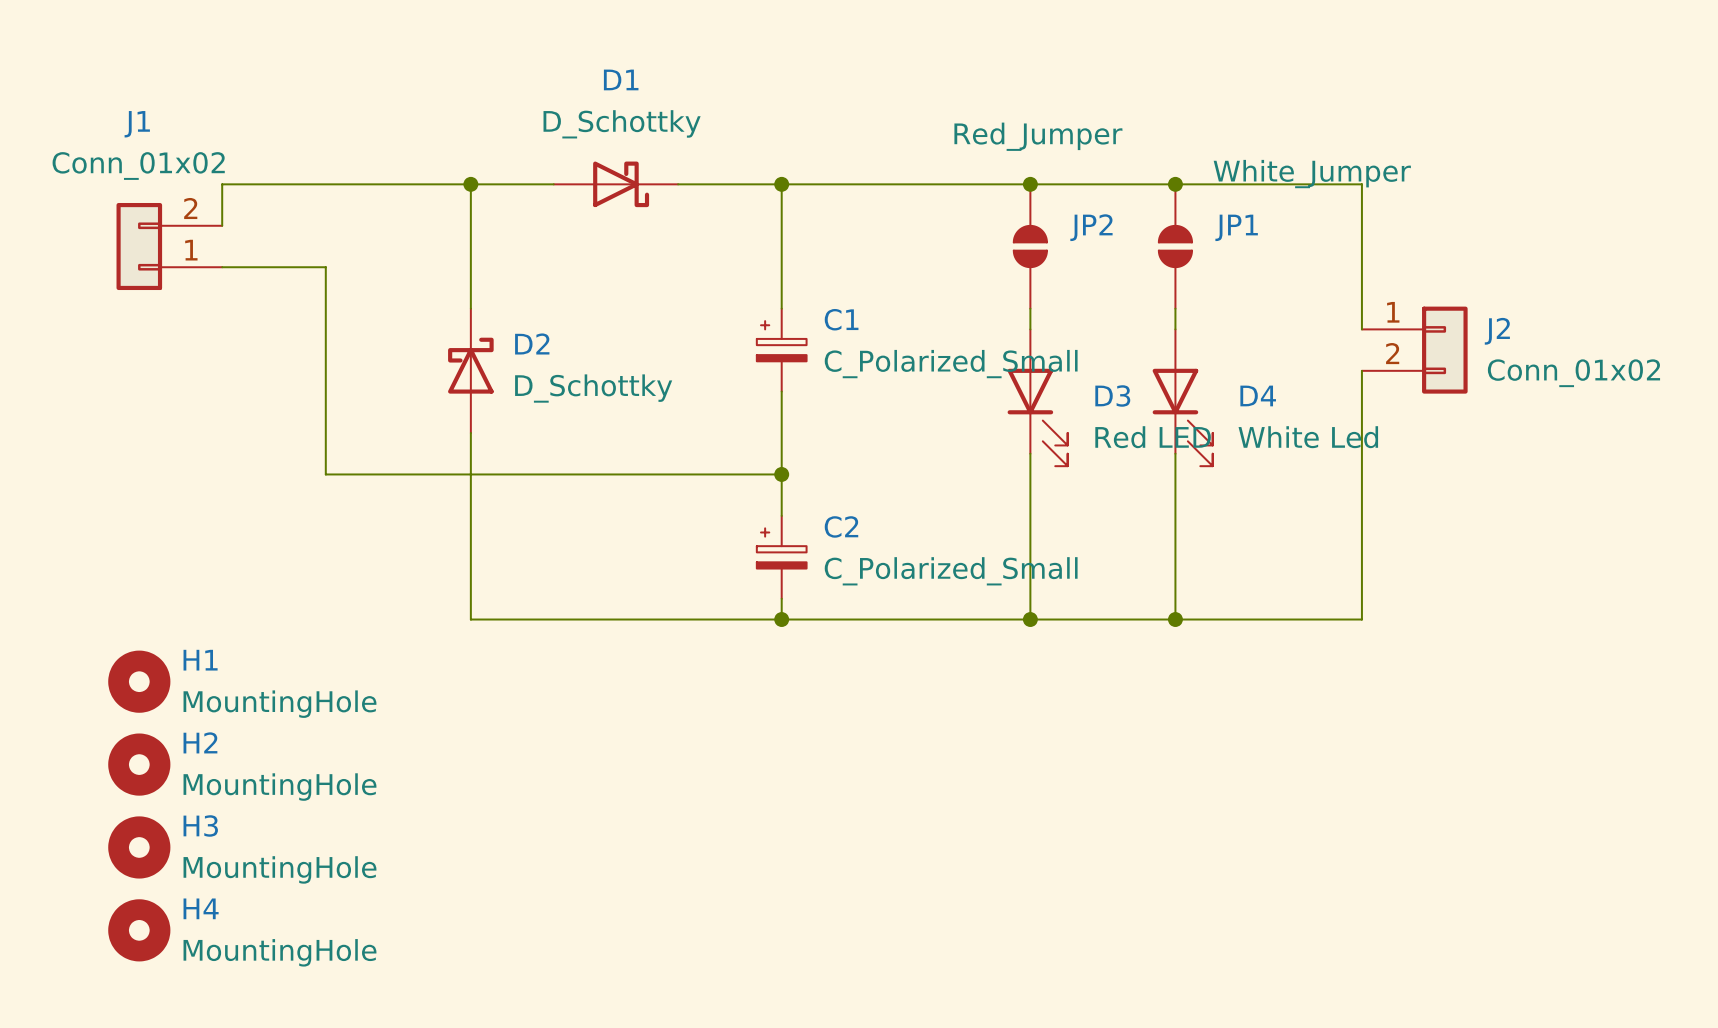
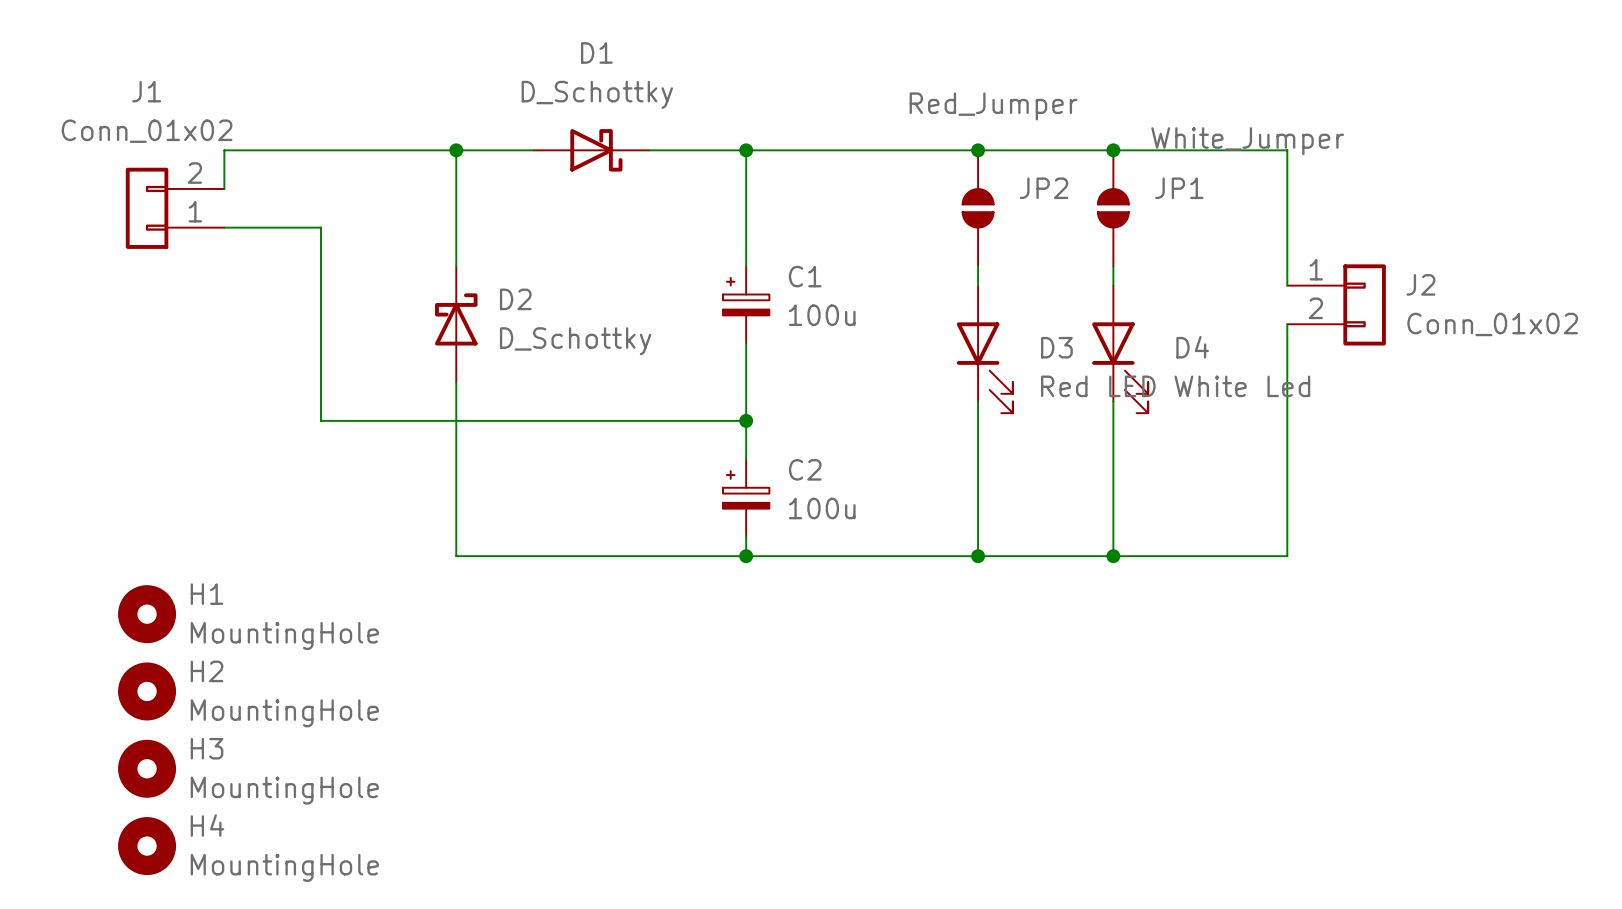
C1 value: C_Polarized_Small (951, 364) -> 100u (822, 315)
C2 value: C_Polarized_Small (951, 571) -> 100u (822, 508)

